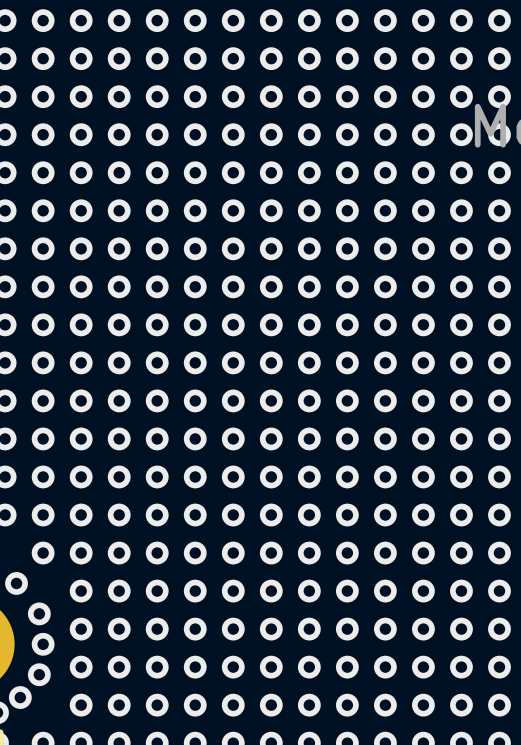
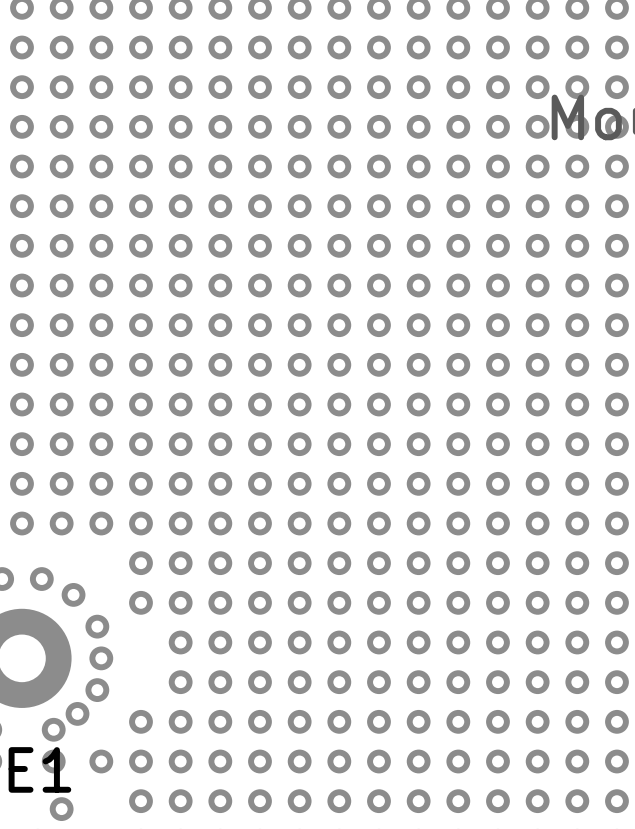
via: (43, 553) -> none
via: (81, 629) -> none
via: (81, 667) -> none

